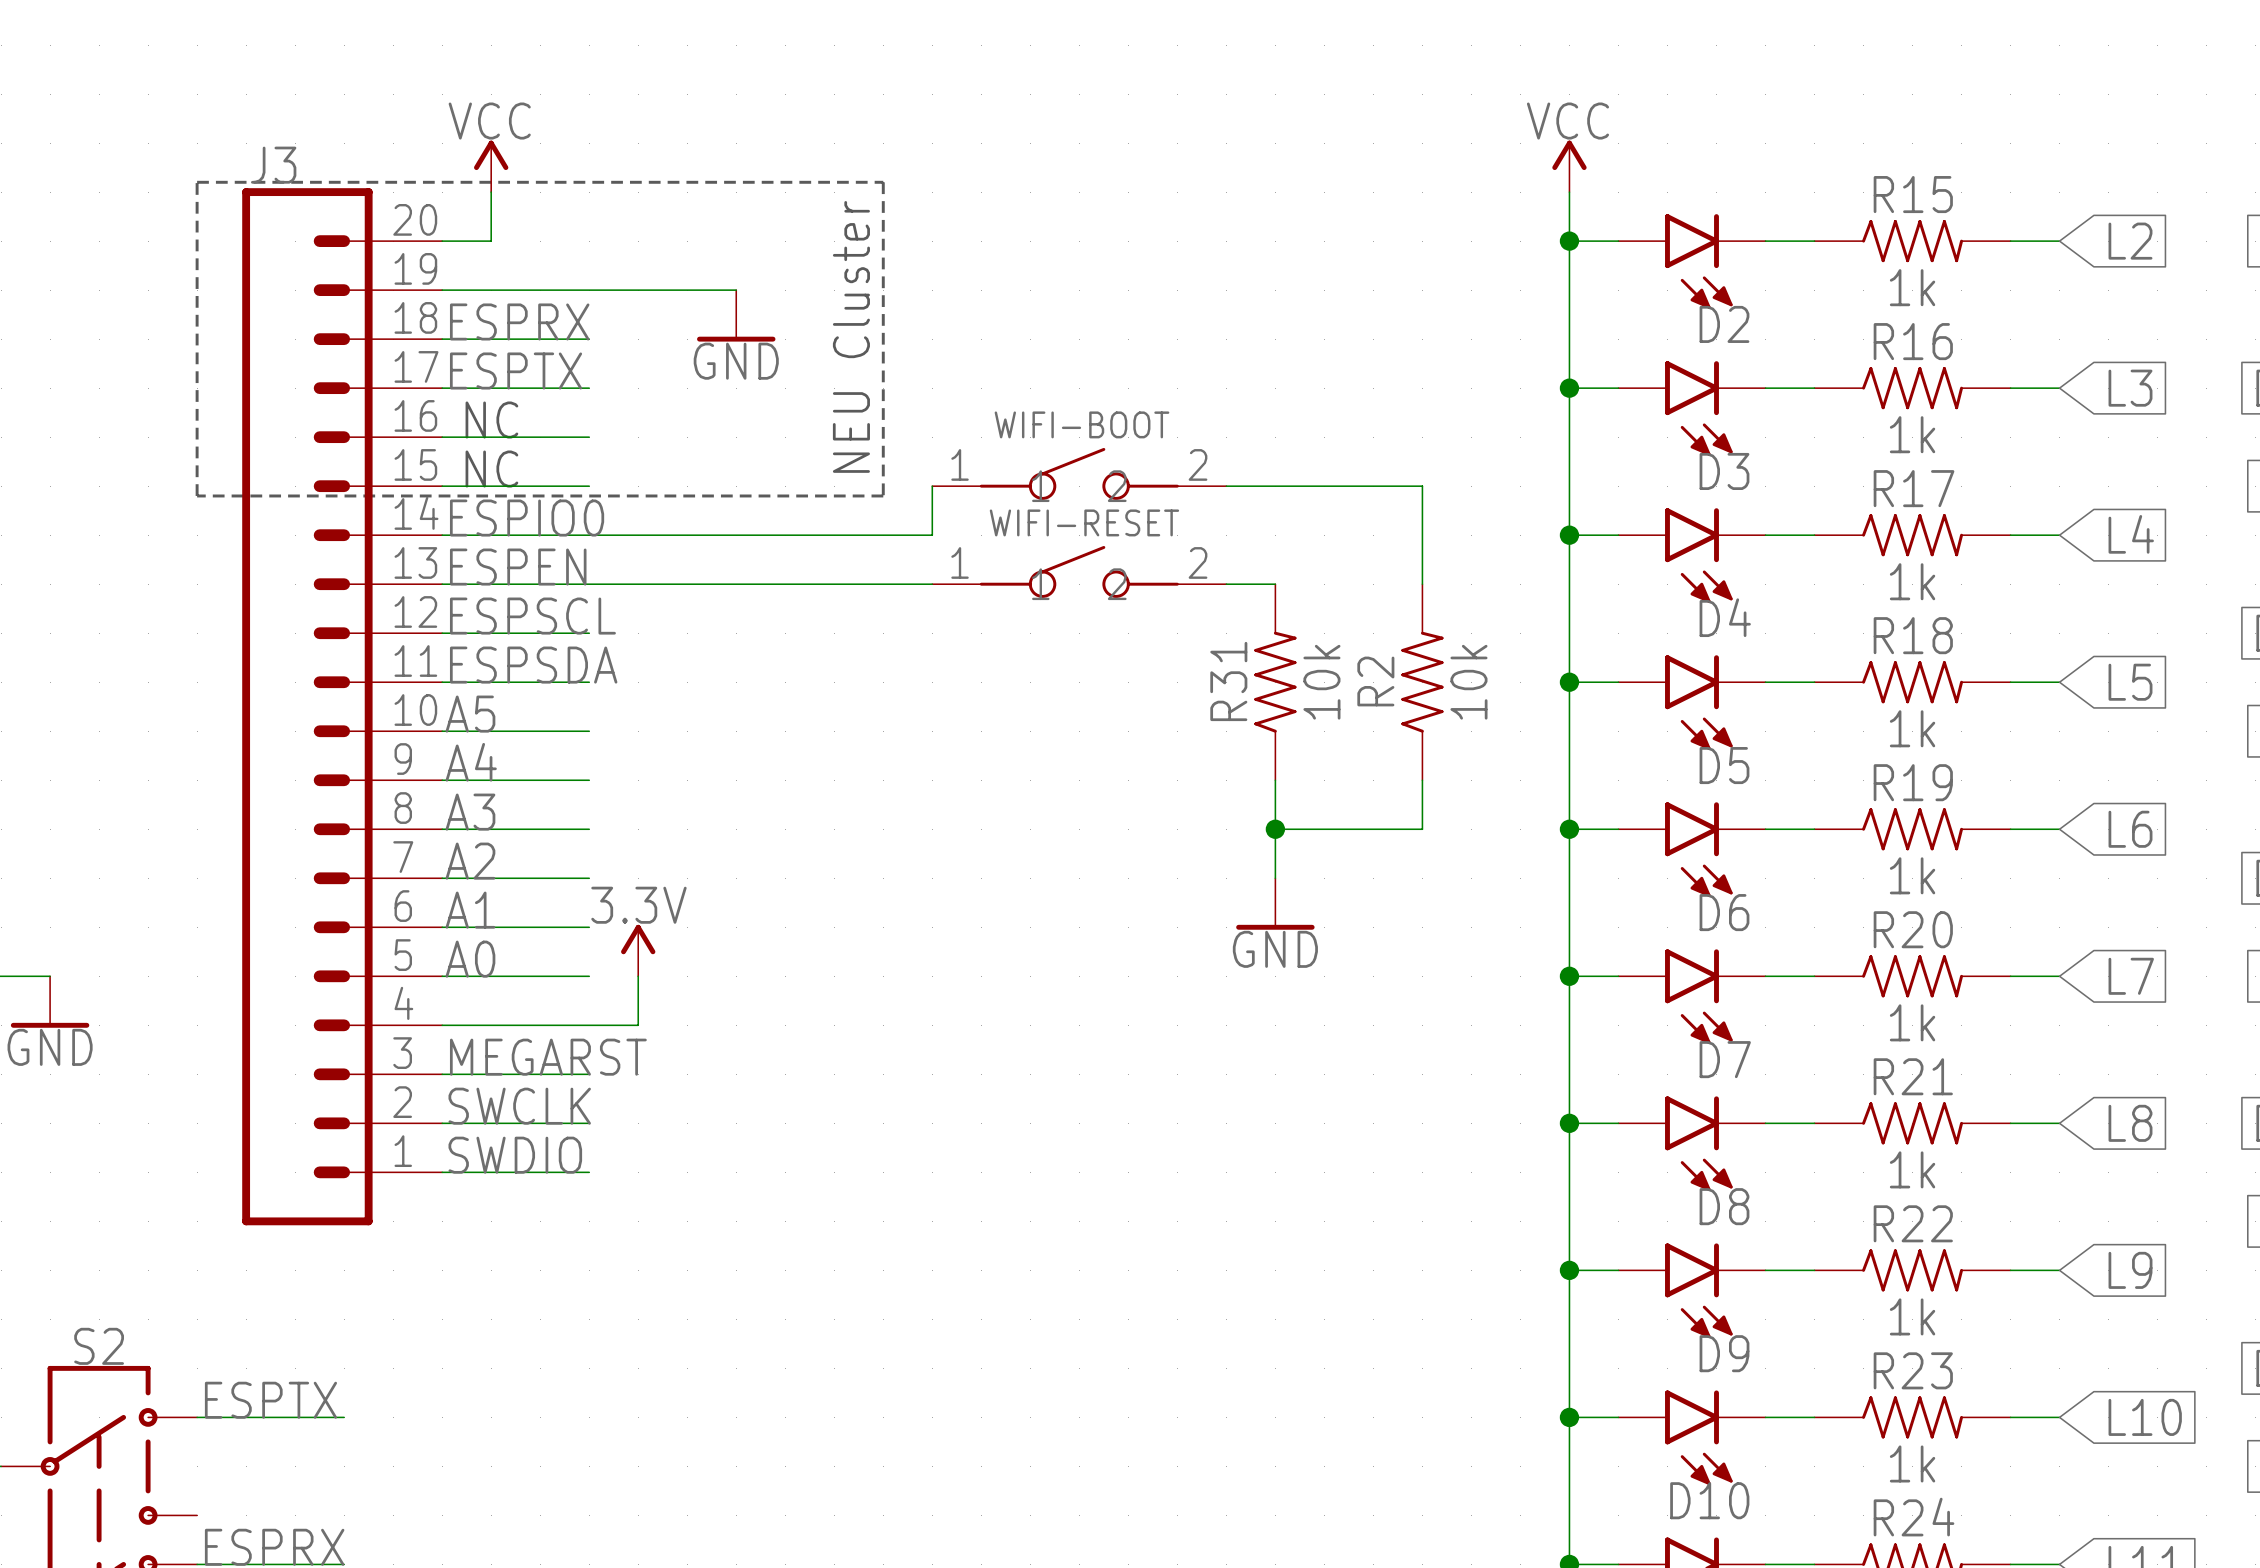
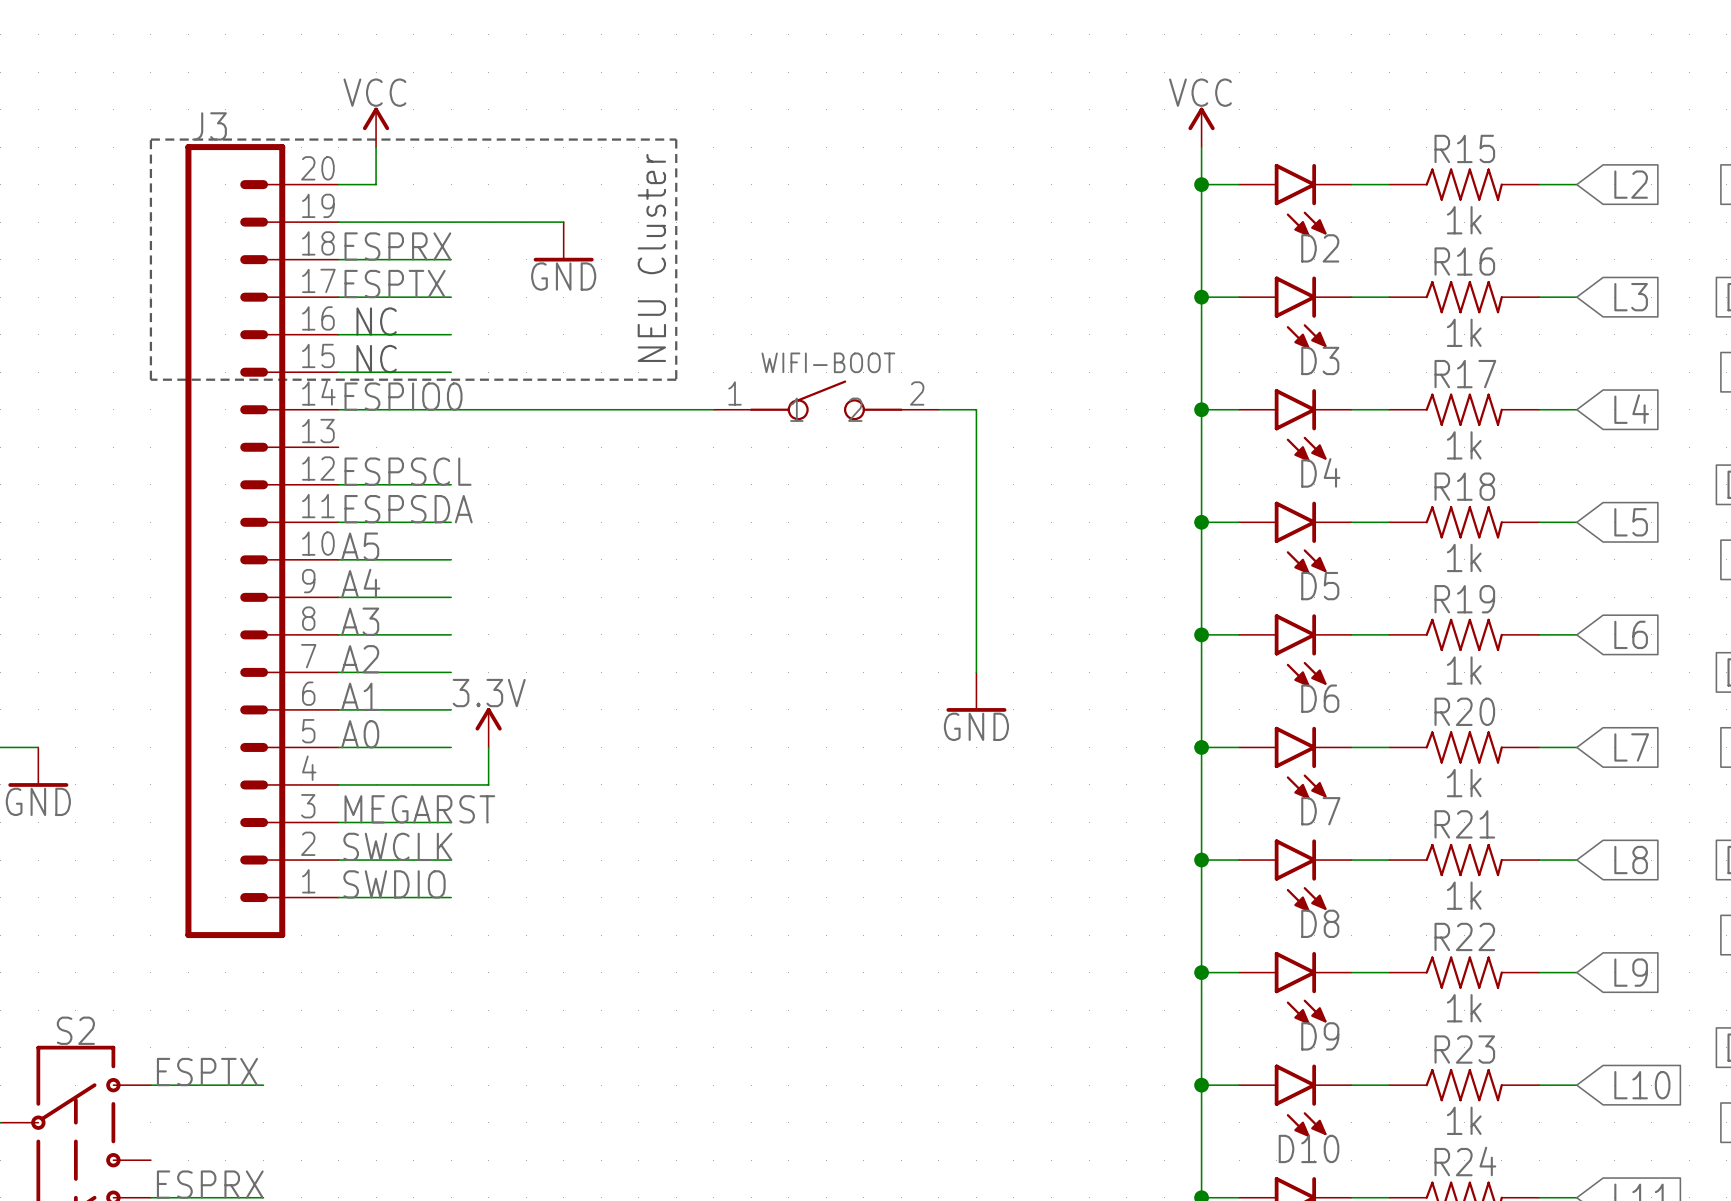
WIFI-BOOT position: (1079, 473) -> (826, 400)
wire: (932, 486) (932, 535) -> none
wire: (1226, 486) (1422, 486) (1422, 584) -> none
wire: none -> (938, 409) (976, 409) (976, 597)
label: ESPEN (518, 567) -> none
WIFI-RESET: (1079, 571) -> none
wire: (442, 584) (932, 584) -> none
wire: (1226, 584) (1275, 584) -> none
R31: 10k (1275, 682) -> none
R2: 10k (1422, 682) -> none
wire: (1422, 780) (1422, 829) (1275, 829) -> none
junction: (1275, 829) -> none

